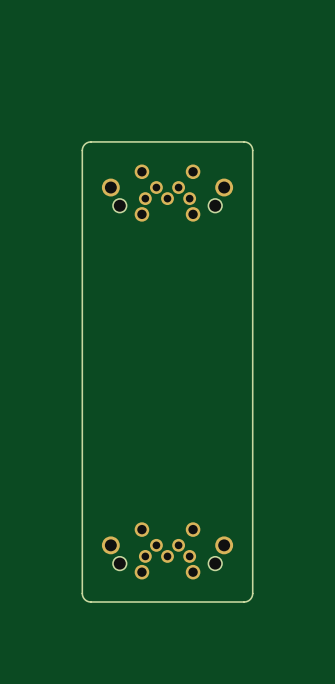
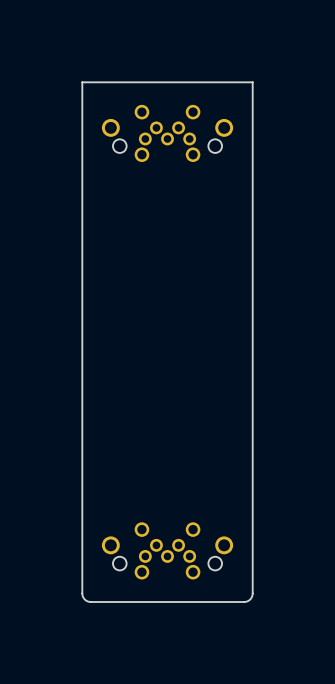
board edge: (252, 150) (250, 144) (244, 141) (90, 141) (84, 144) (82, 150) -> (252, 150) (252, 82) (82, 82) (82, 150)
part position: (167, 193) -> (167, 133)

